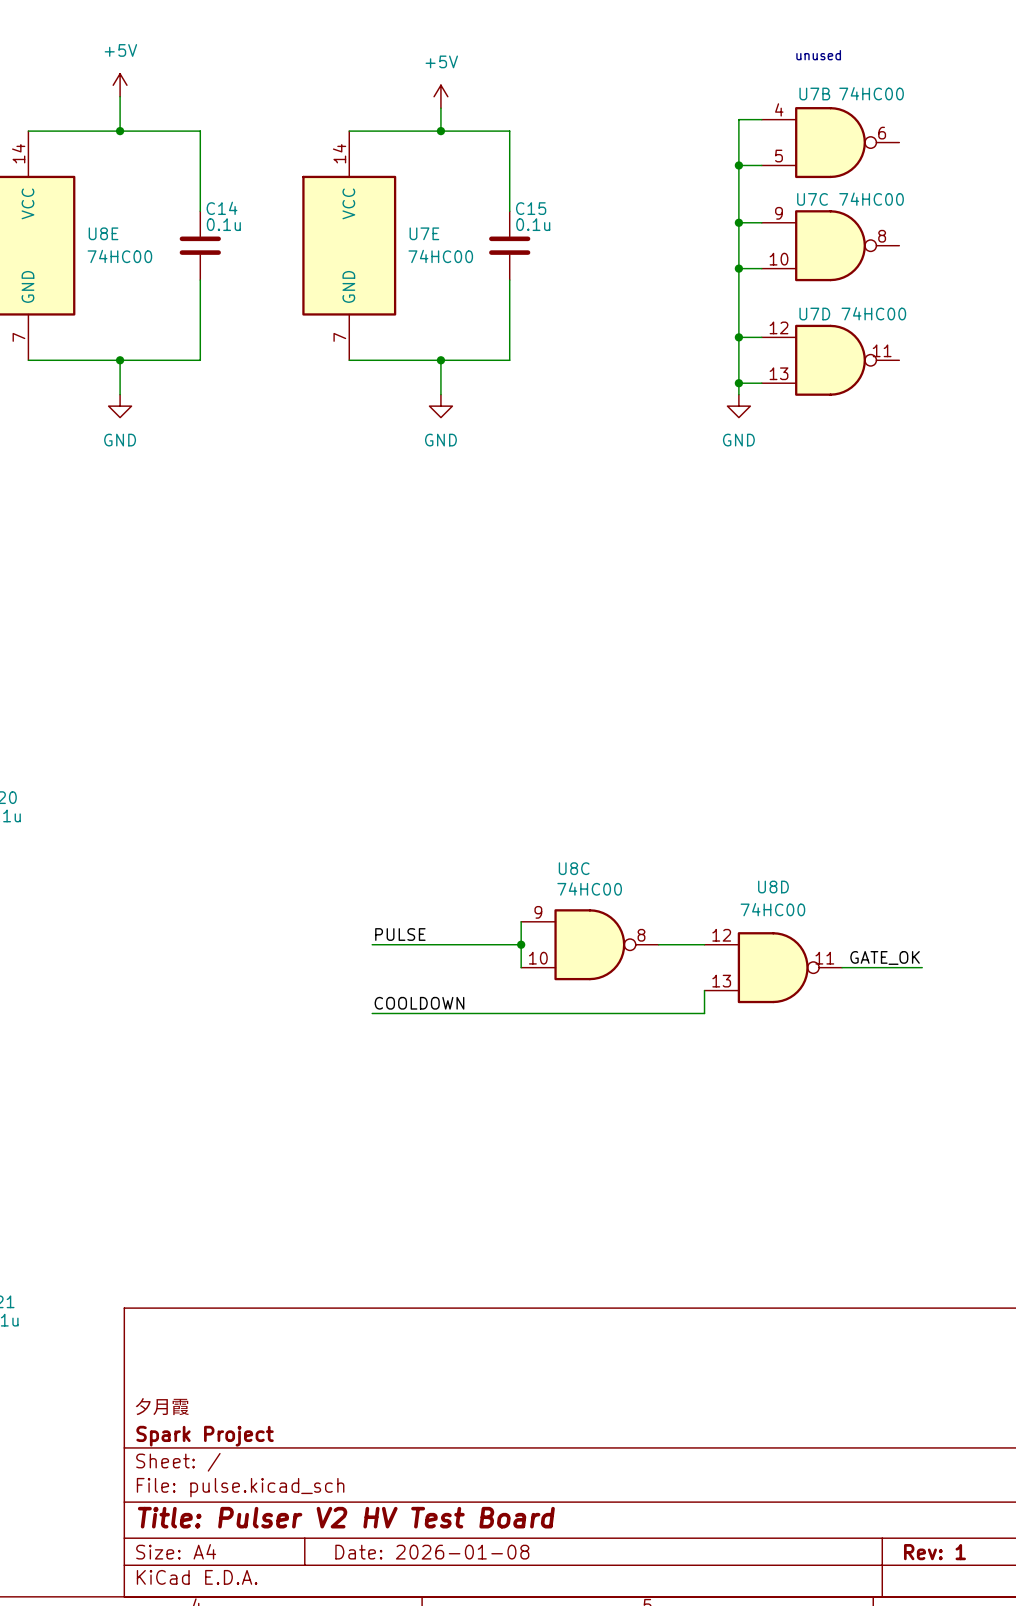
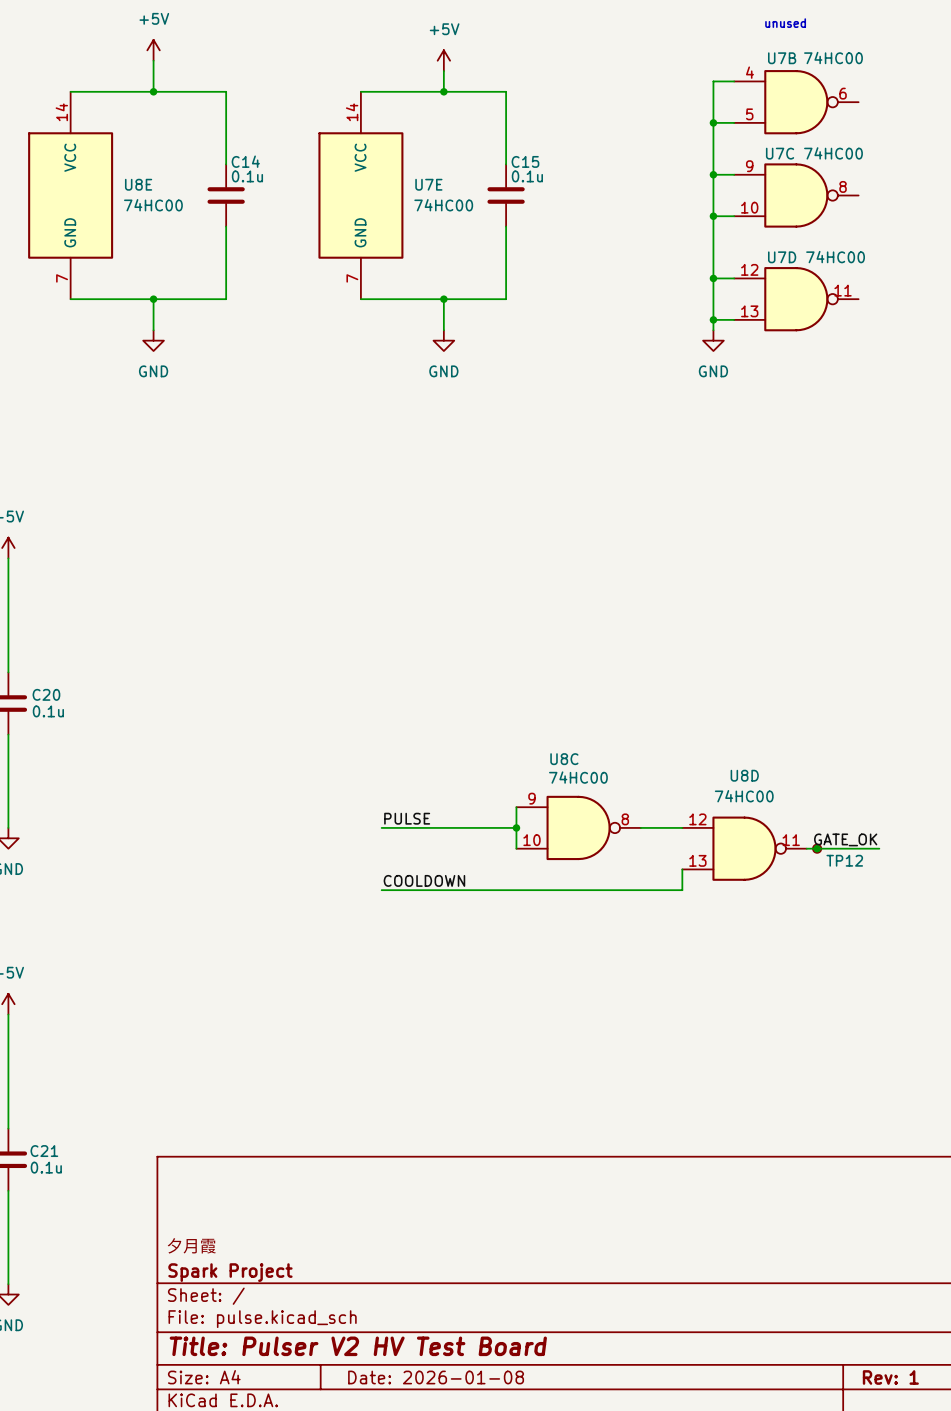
junction: none -> (817, 848)
TP12: none -> (817, 848)

